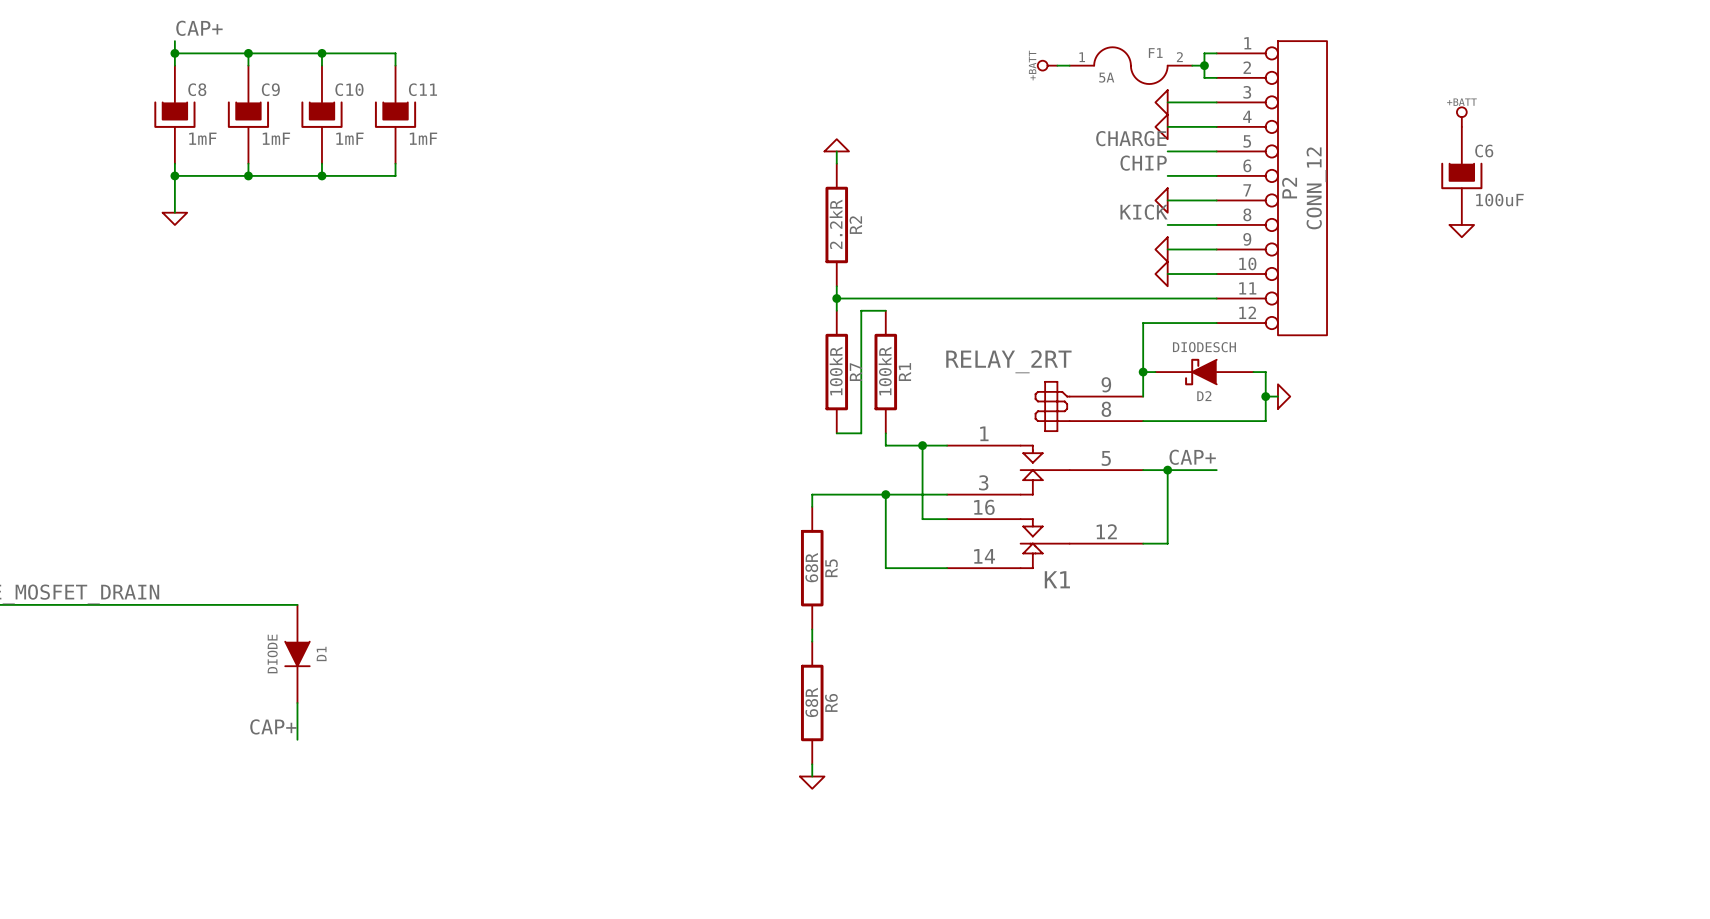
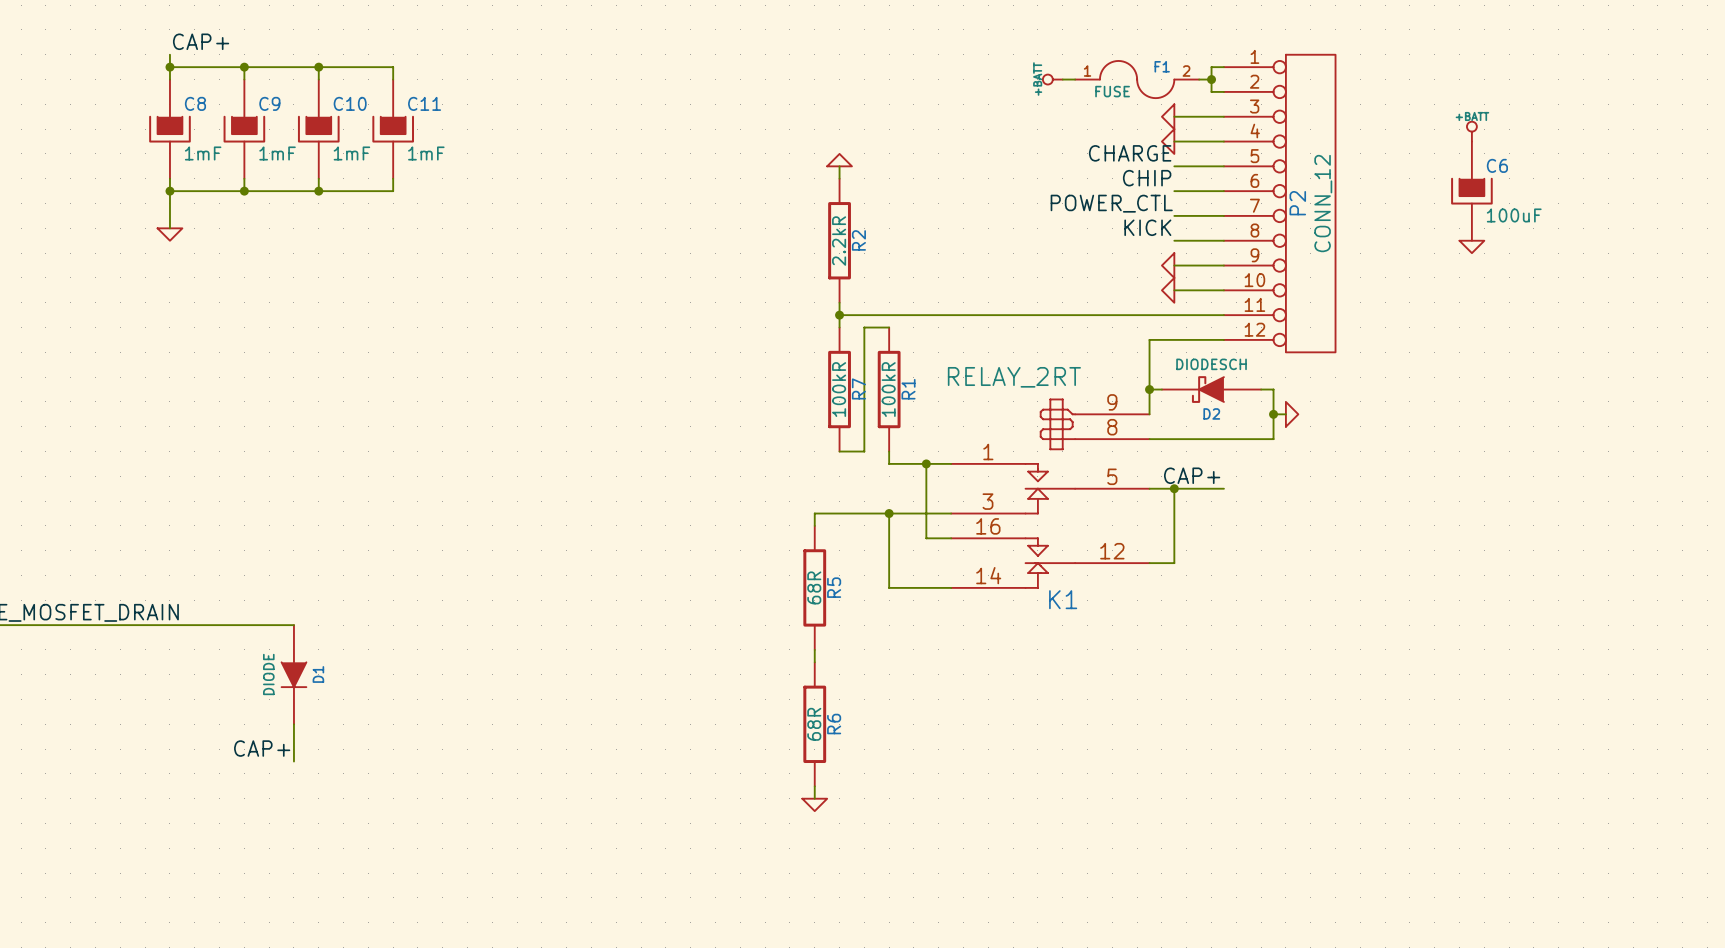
F1 value: 5A (1106, 77) -> FUSE (1112, 91)
label: none -> POWER_CTL (1111, 203)
power symbol: (1161, 200) -> none

